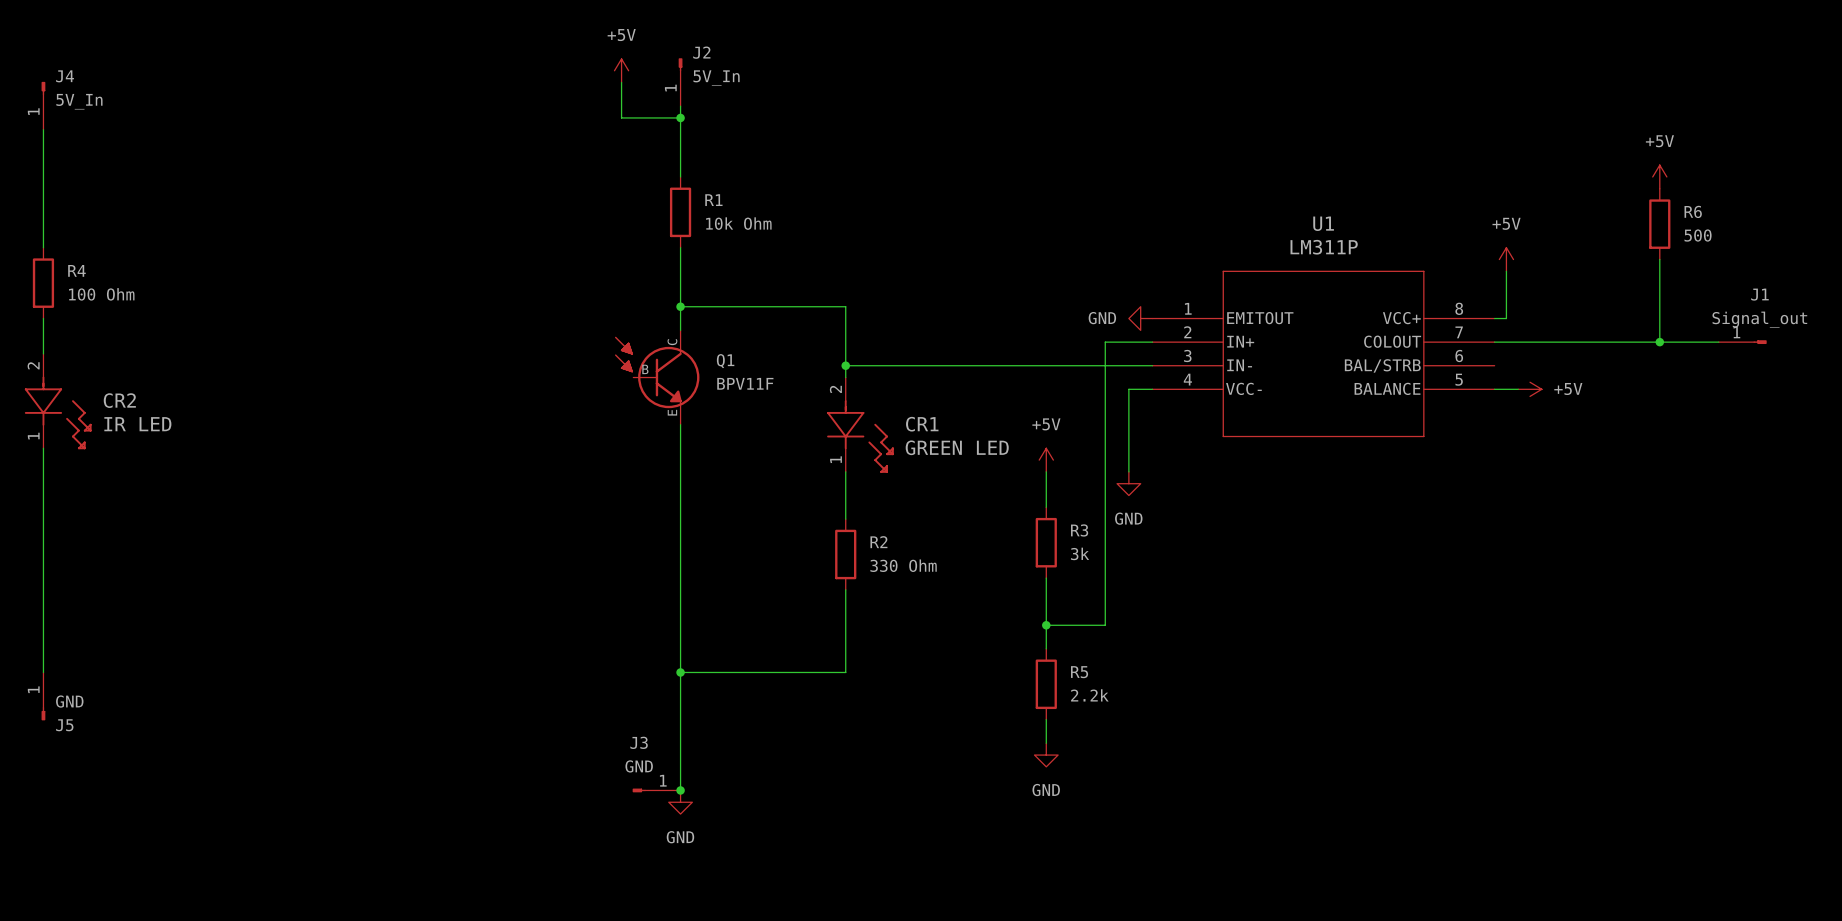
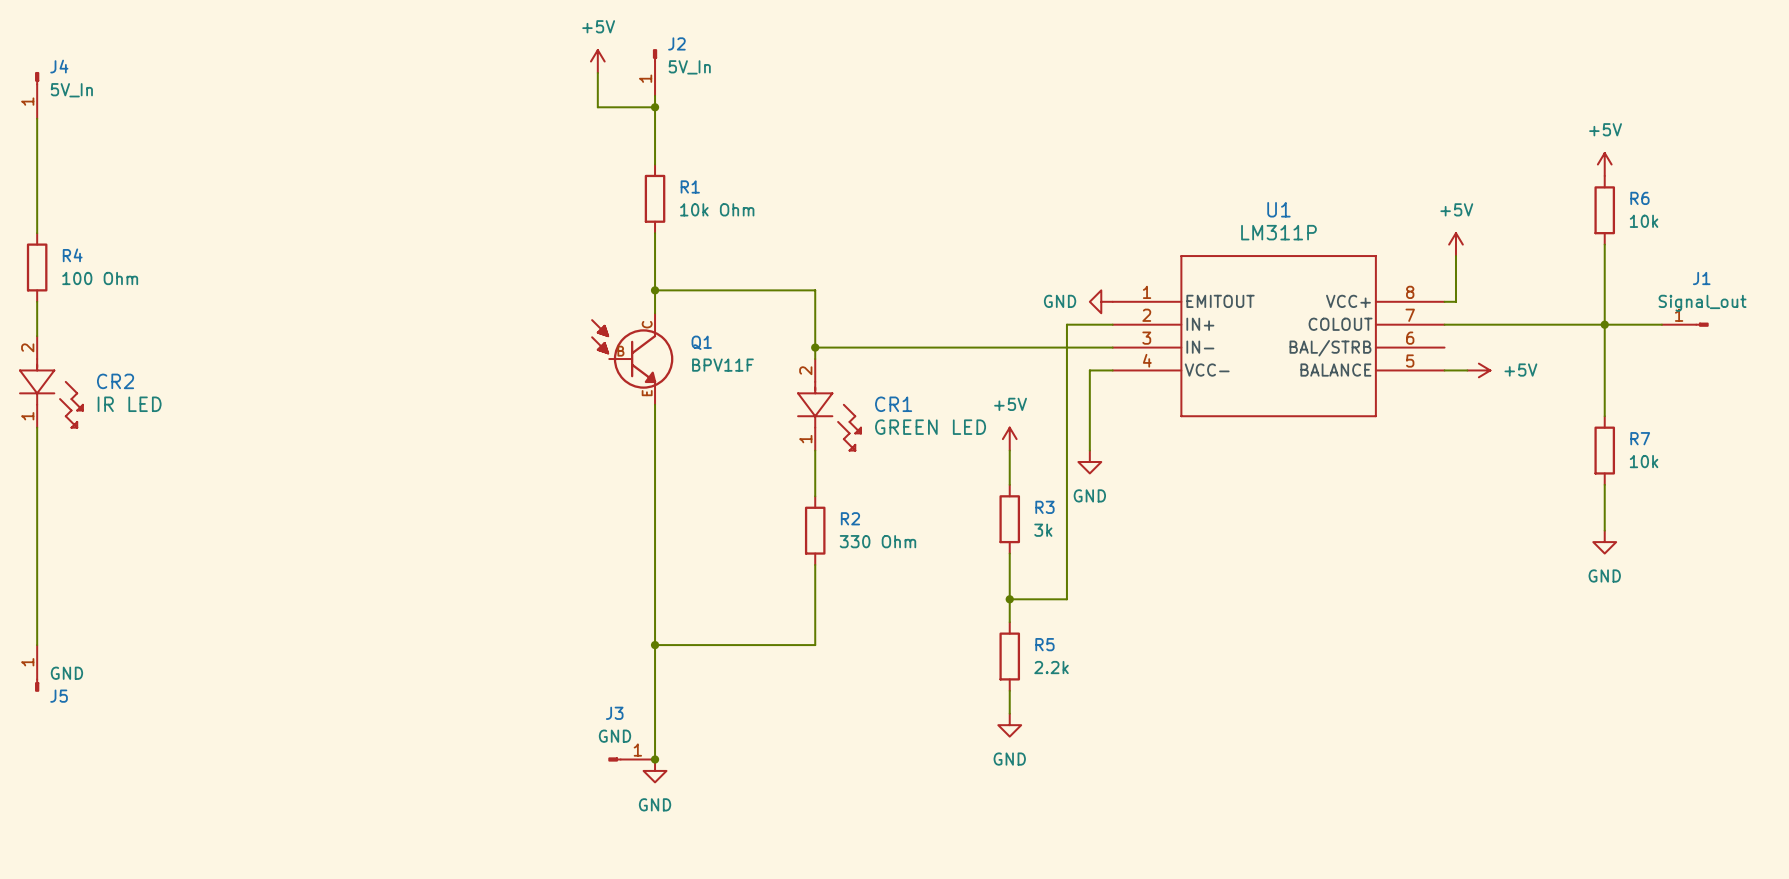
R6 value: 500 (1698, 235) -> 10k (1644, 221)
wire: none -> (1604, 324) (1604, 416)
R7: none -> 10k (1604, 450)
wire: none -> (1604, 484) (1604, 530)
power symbol: none -> GND (1604, 542)

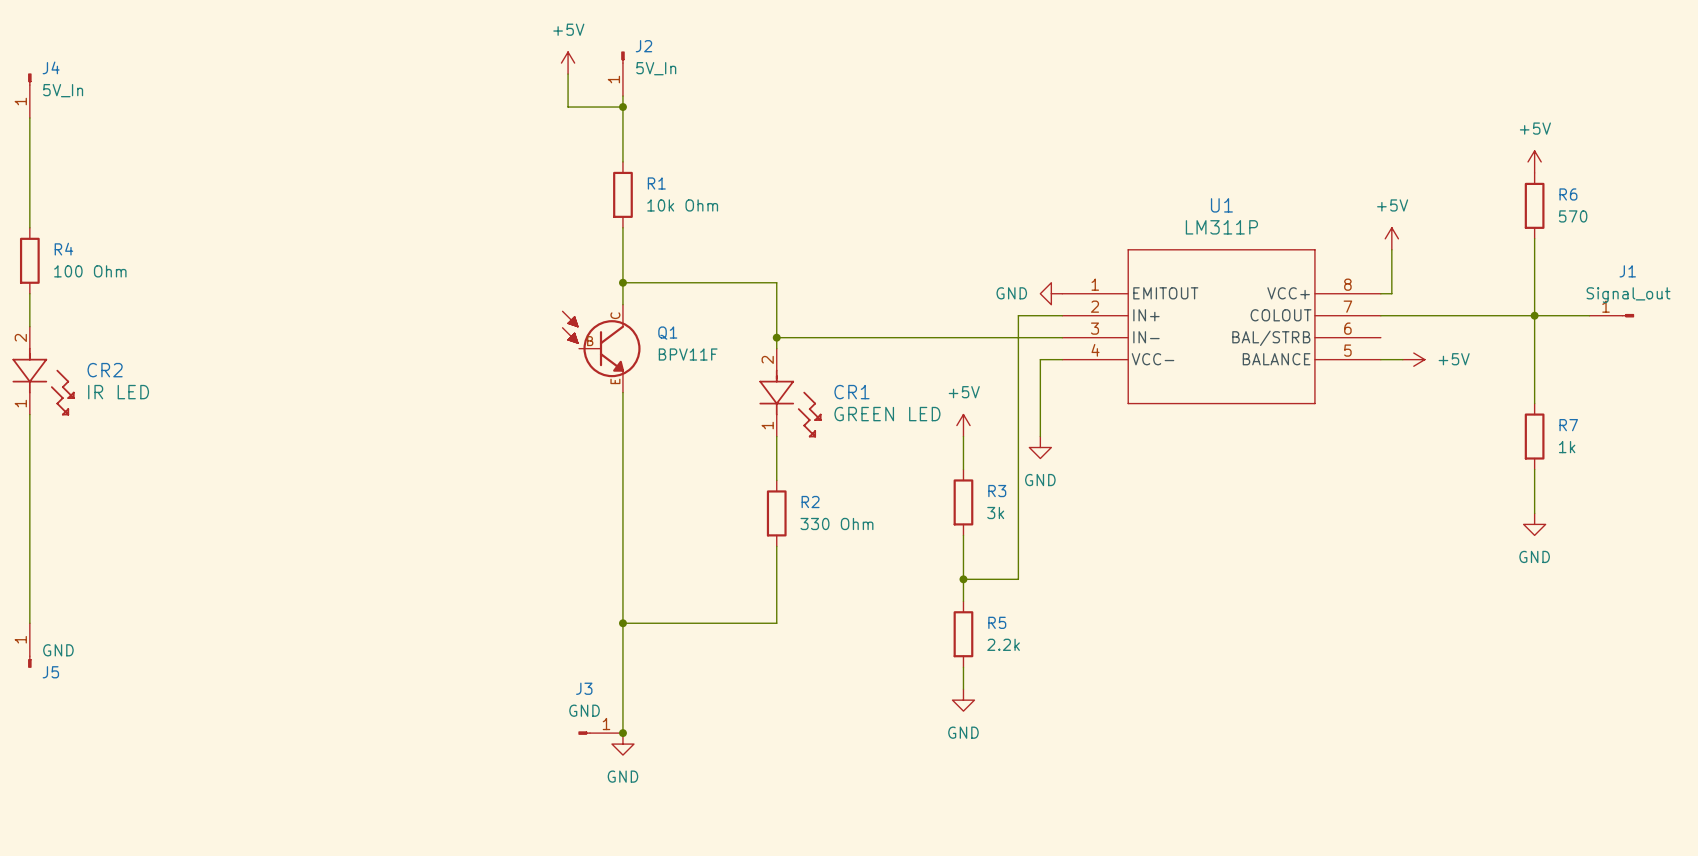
R6 value: 10k (1644, 221) -> 570 (1573, 216)
R7 value: 10k (1644, 461) -> 1k (1567, 447)

